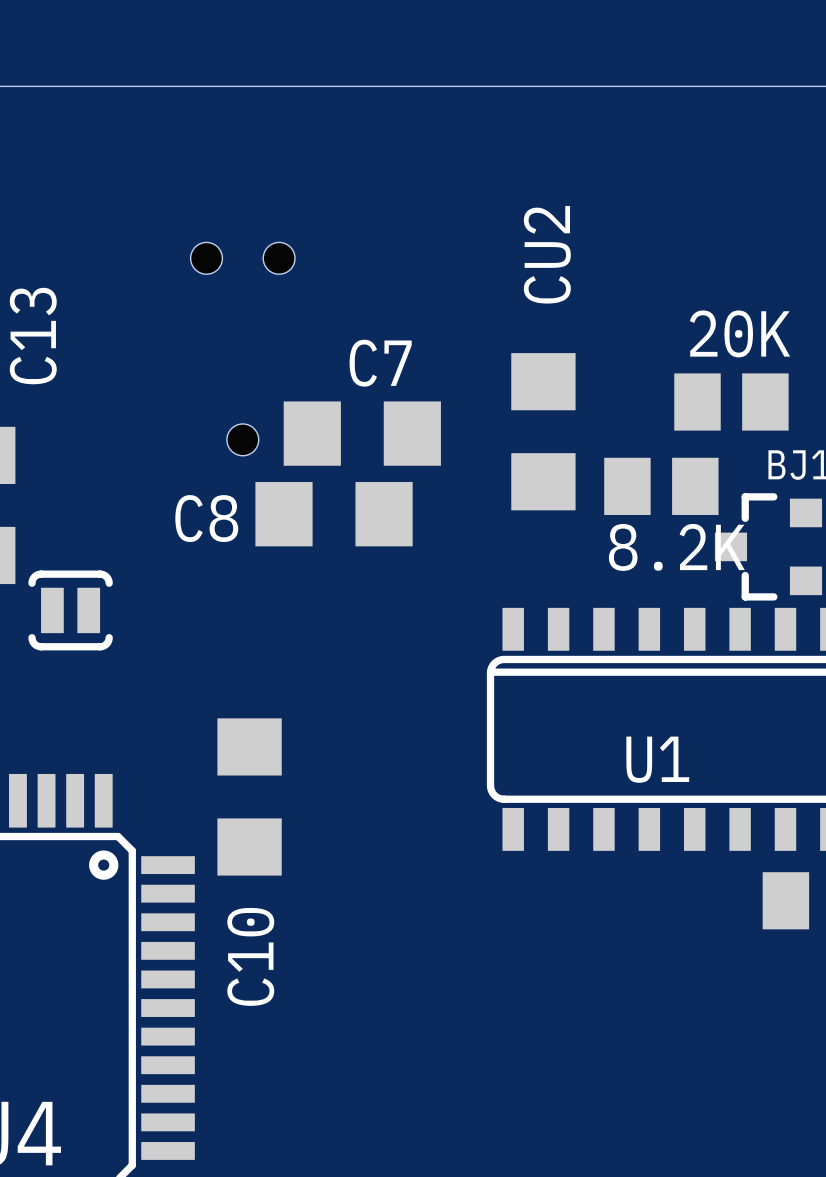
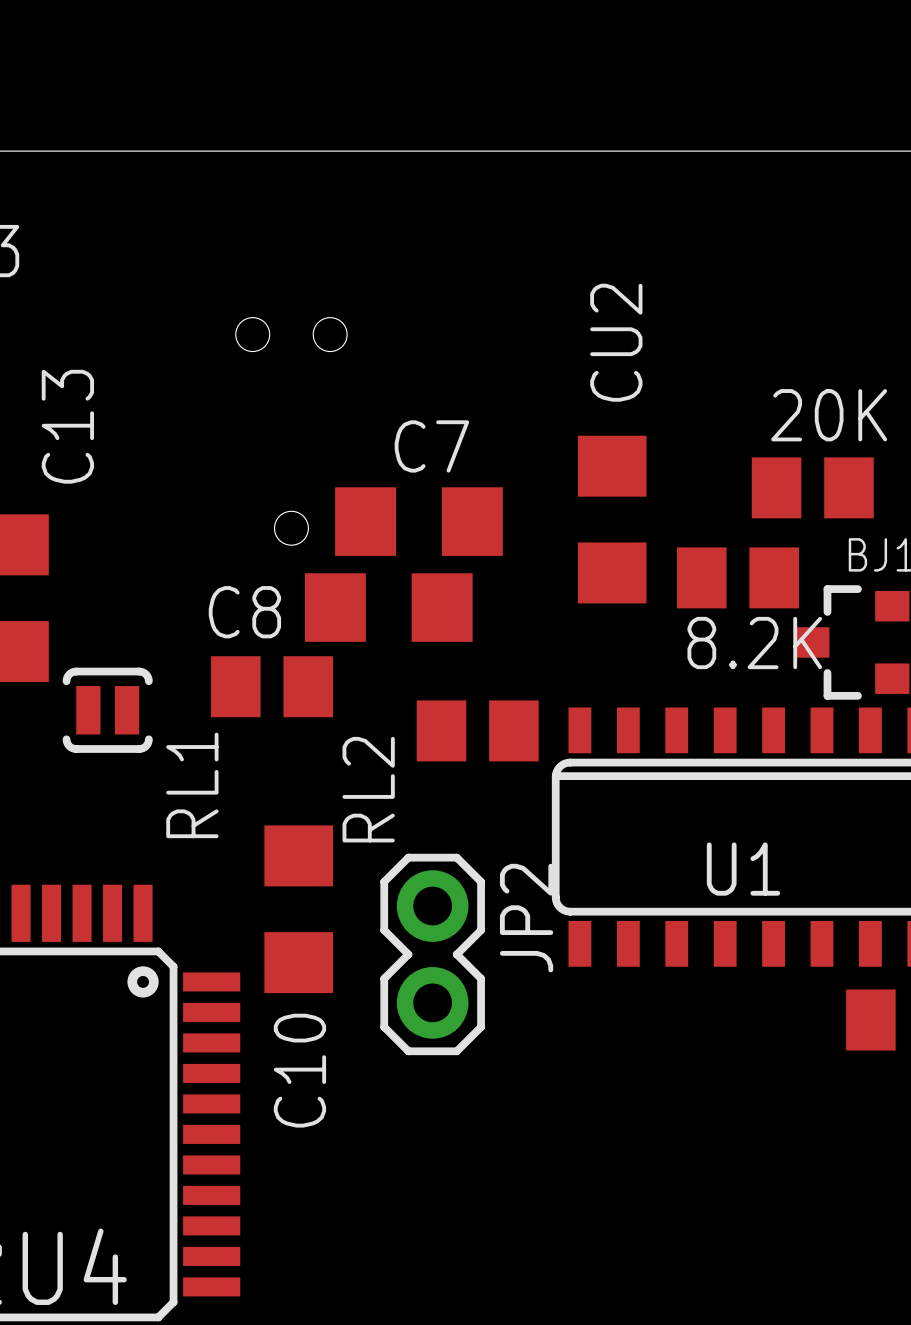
RL1: none -> (272, 686)
RL2: none -> (477, 730)
JP2: none -> (432, 954)

